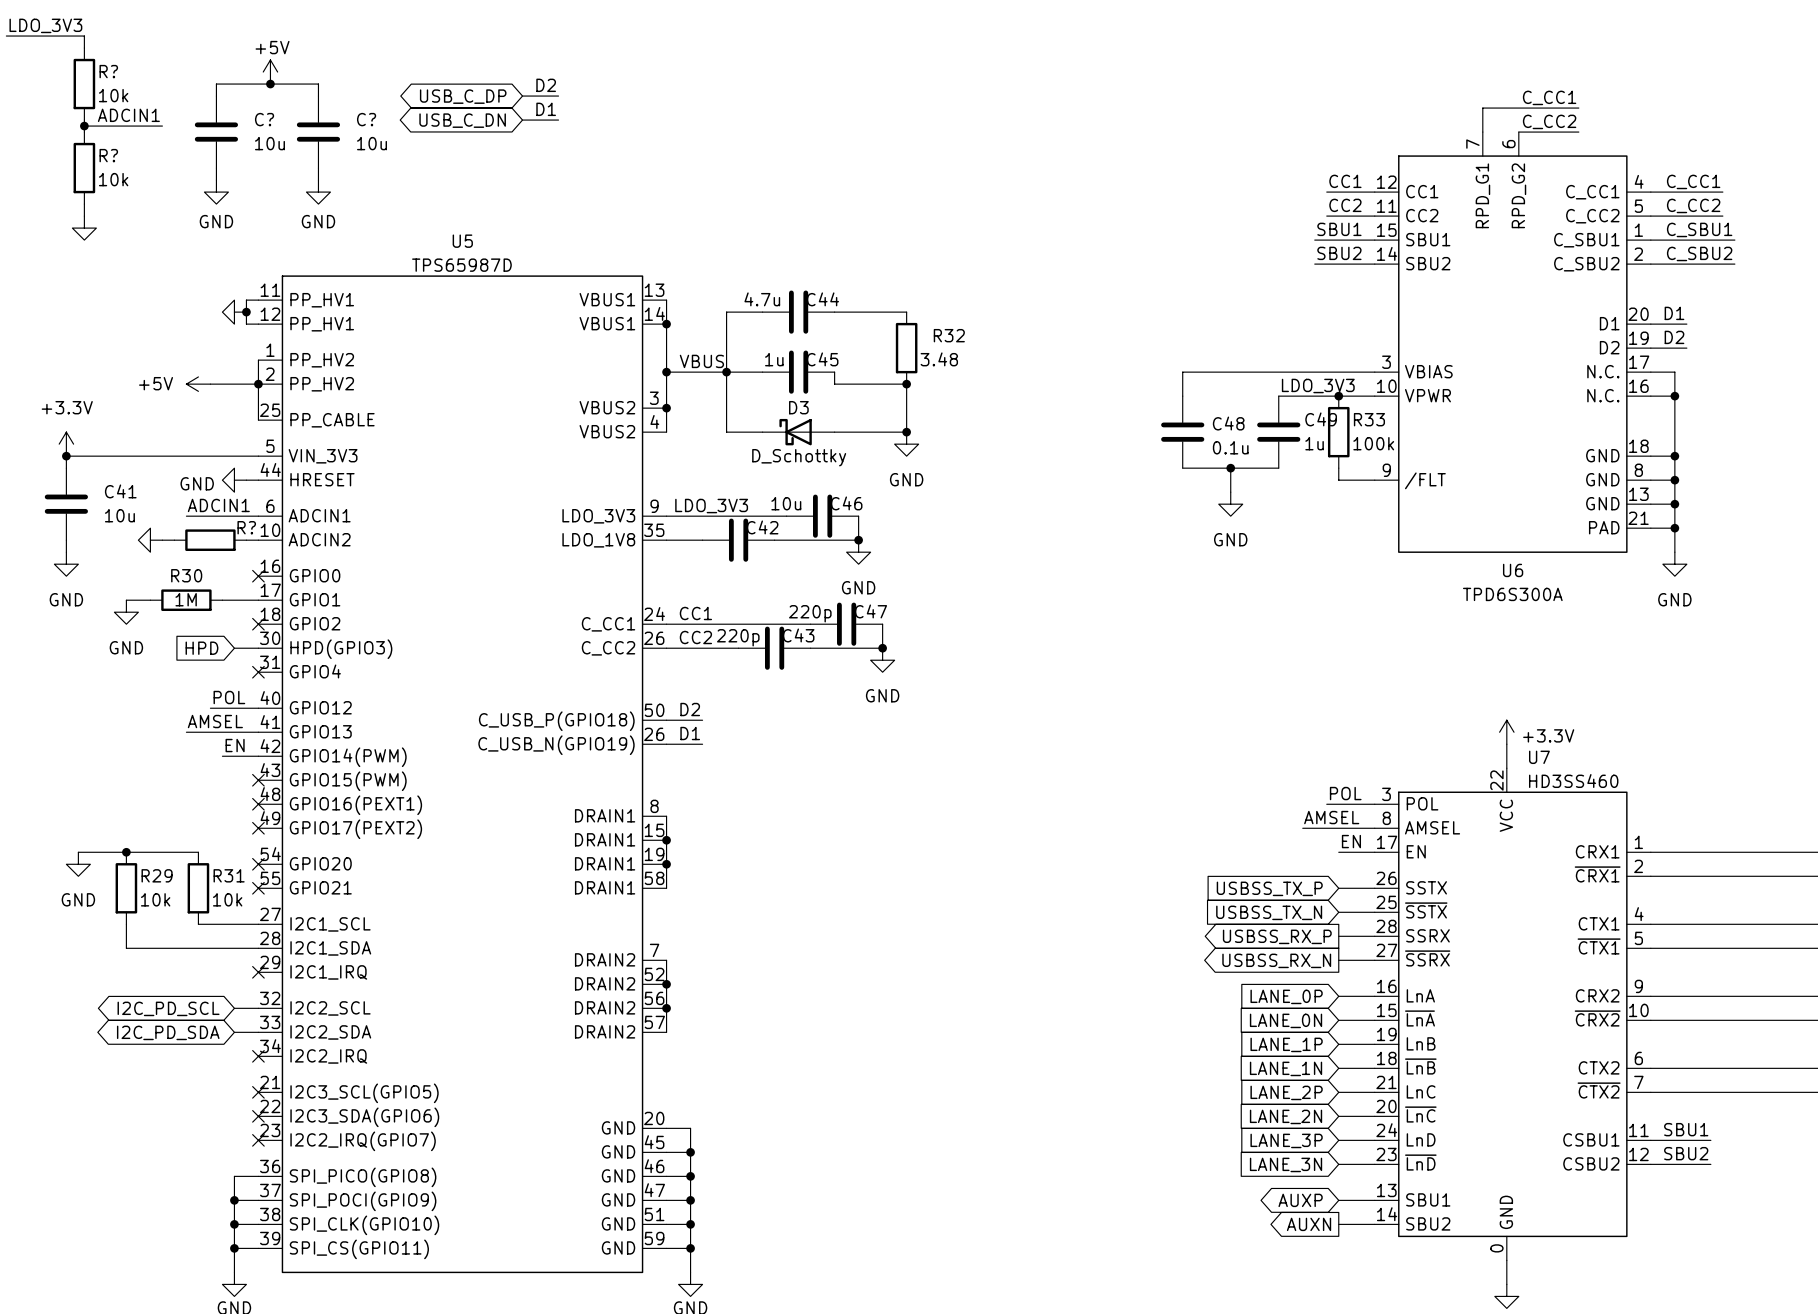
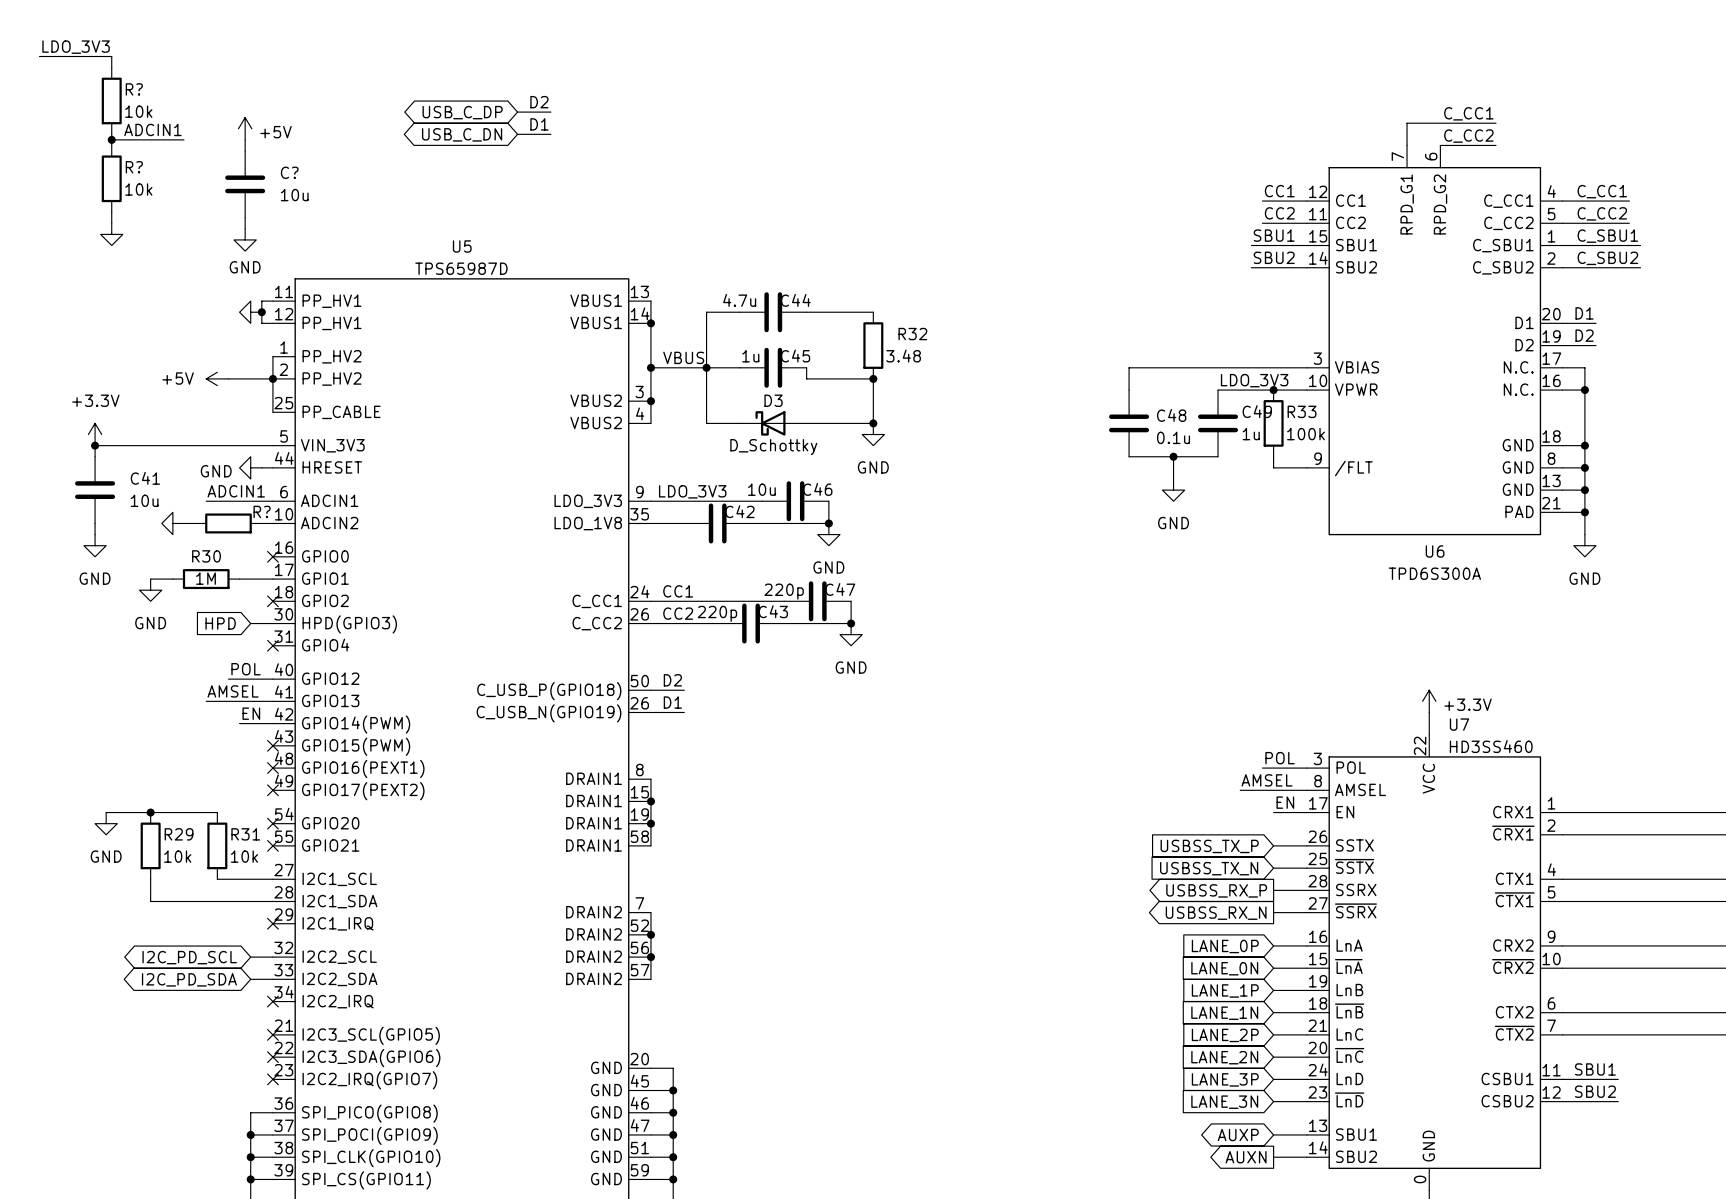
power symbol text position: +5V (272, 47) -> +5V (276, 132)
power symbol position: +5V (270, 72) -> +5V (245, 128)
junction: (270, 84) -> none
wire: (216, 96) (216, 84) (318, 84) (318, 96) -> none
C? position: (216, 132) -> (245, 184)
C?: 10u (318, 132) -> none
wire: (216, 168) (216, 180) -> (245, 217) (245, 228)
wire: (318, 168) (318, 180) -> (245, 139) (245, 151)
power symbol position: GND (216, 192) -> GND (245, 239)
power symbol: GND (318, 192) -> none

